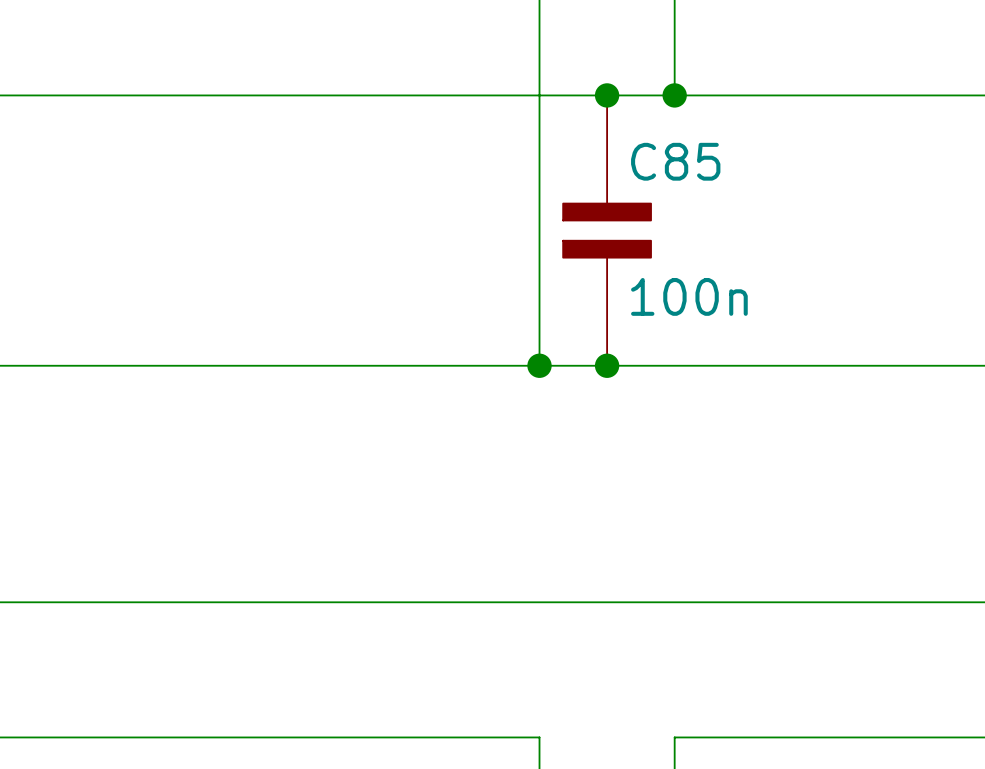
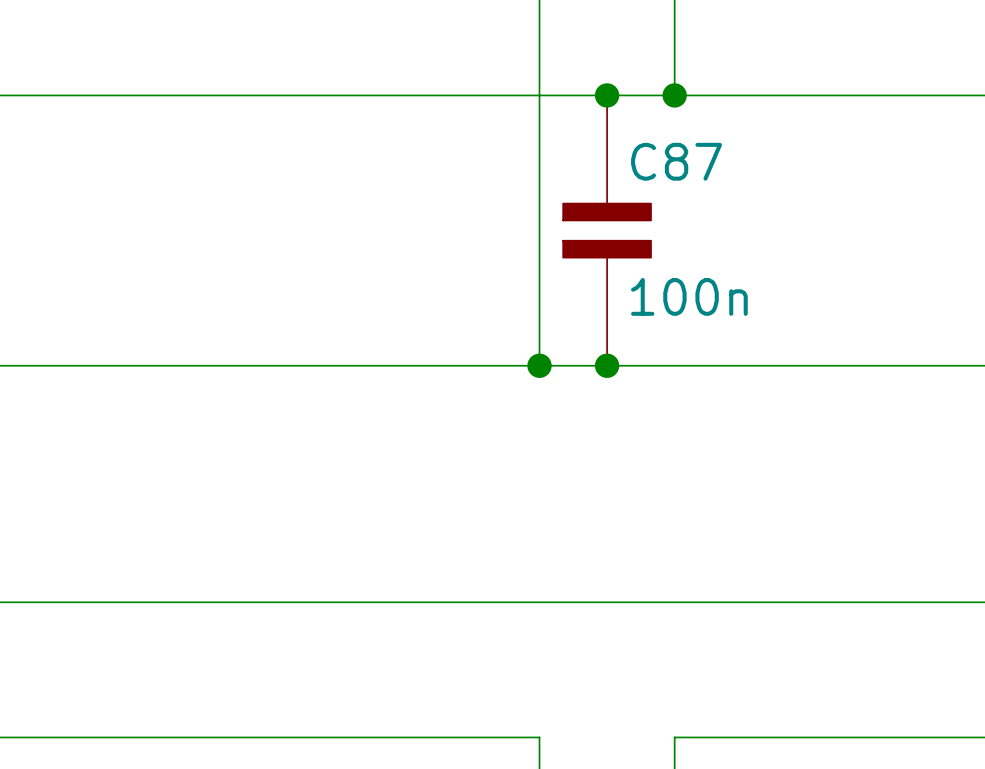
C85 name: C85 (675, 161) -> C87 (676, 161)

